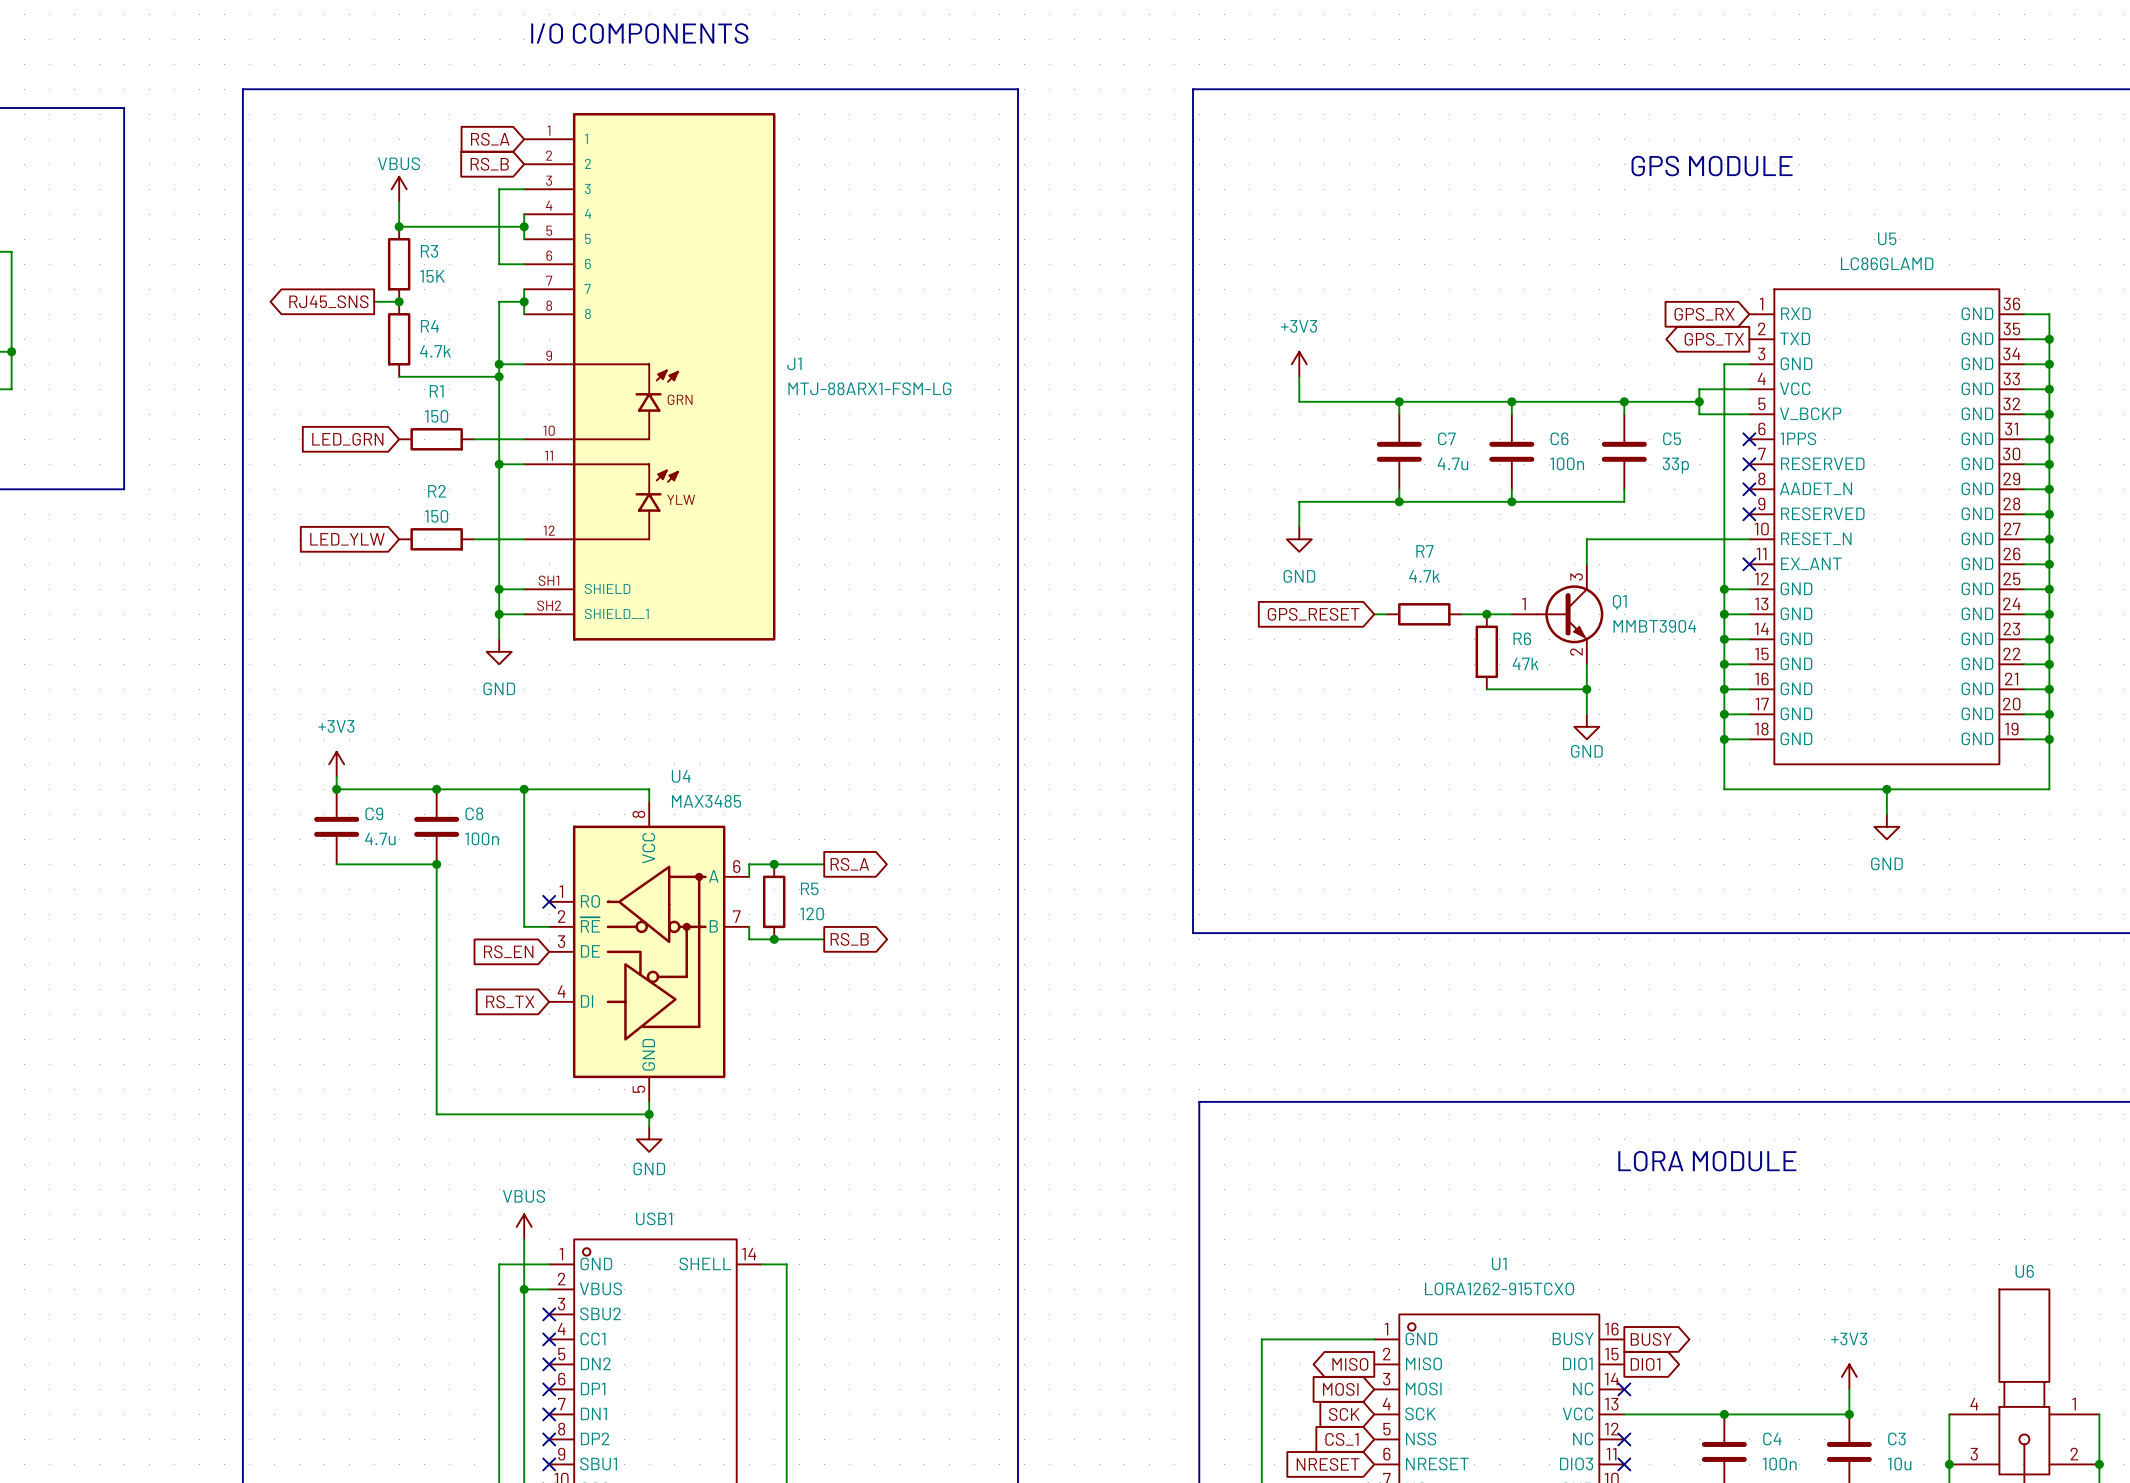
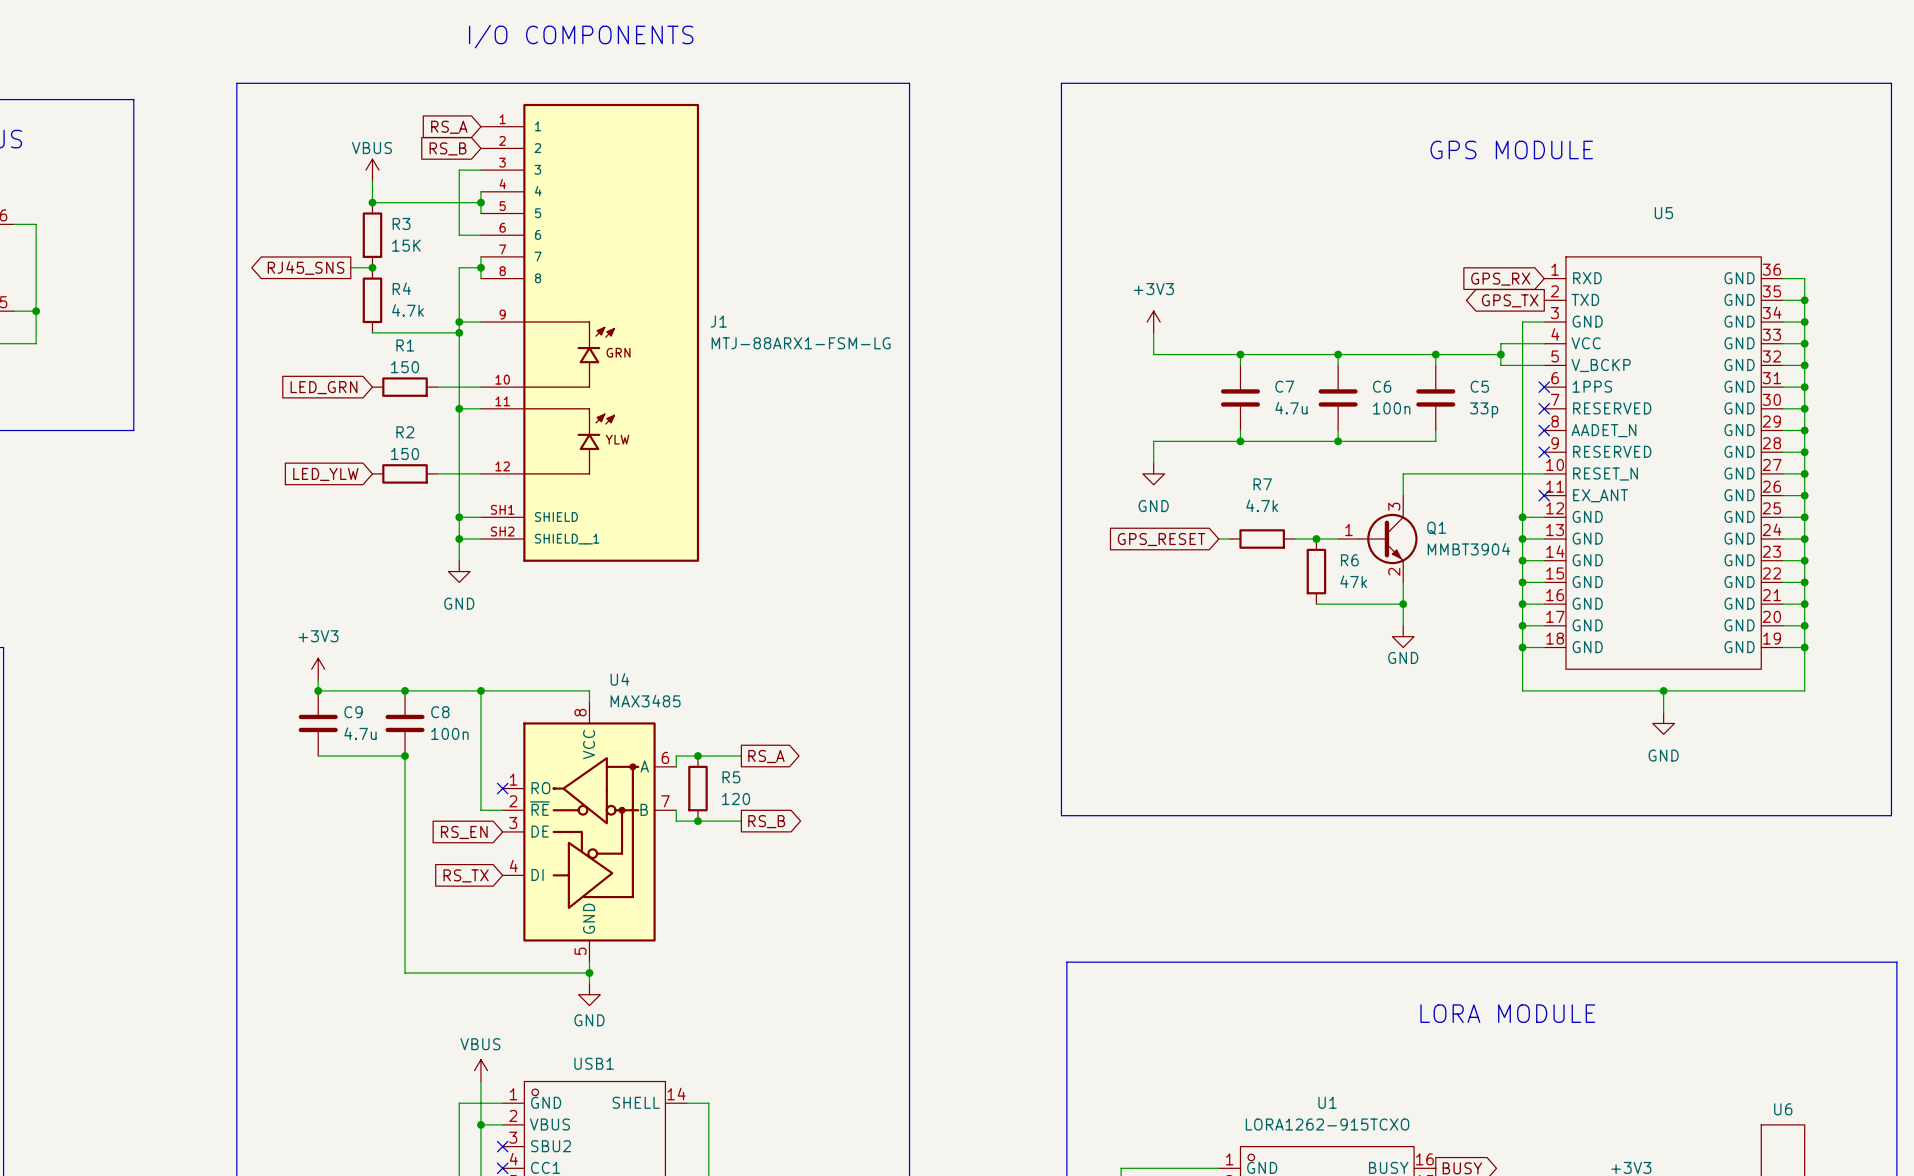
U5 value: LC86GLAMD (1887, 263) -> none

